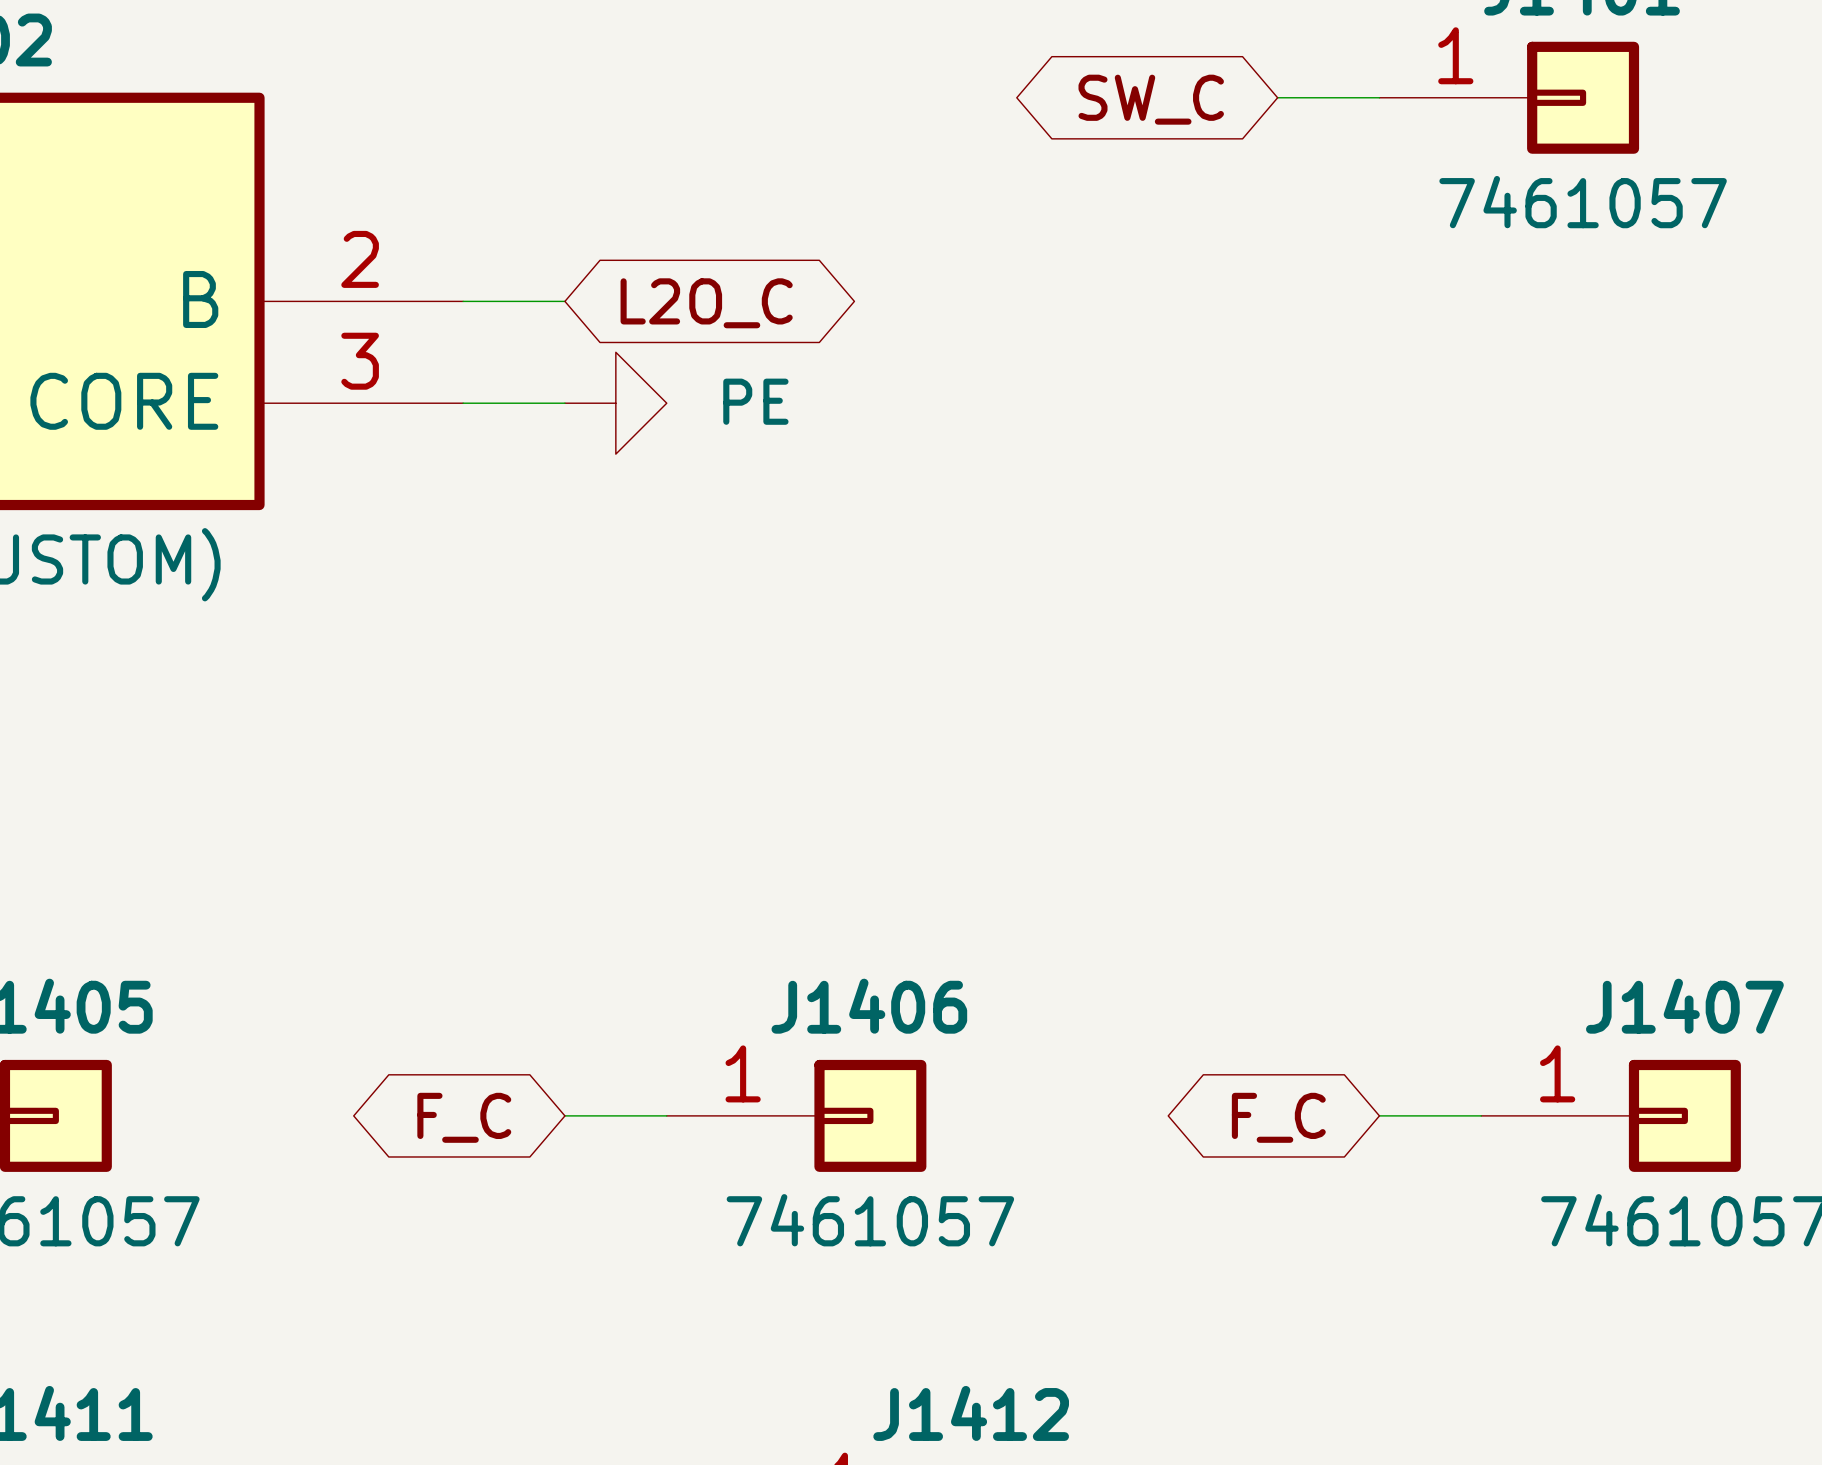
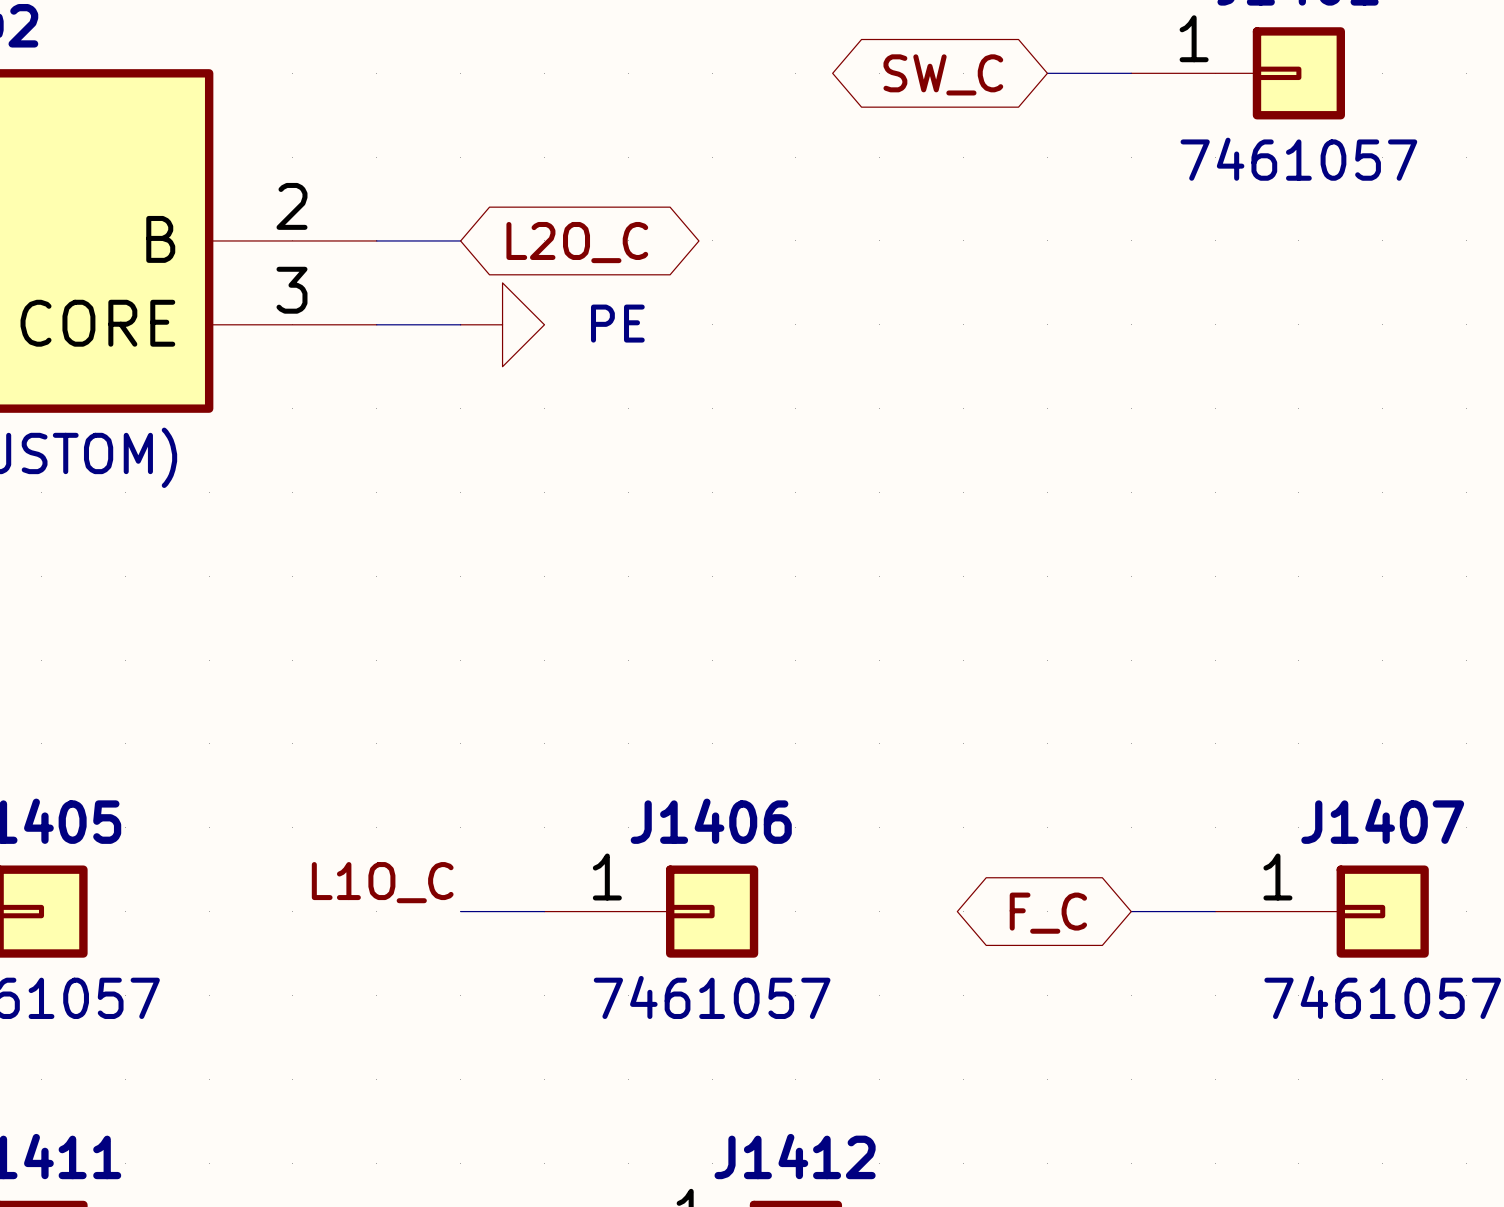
label: none -> L1O_C (382, 882)
global label: F_C (464, 1117) -> none

